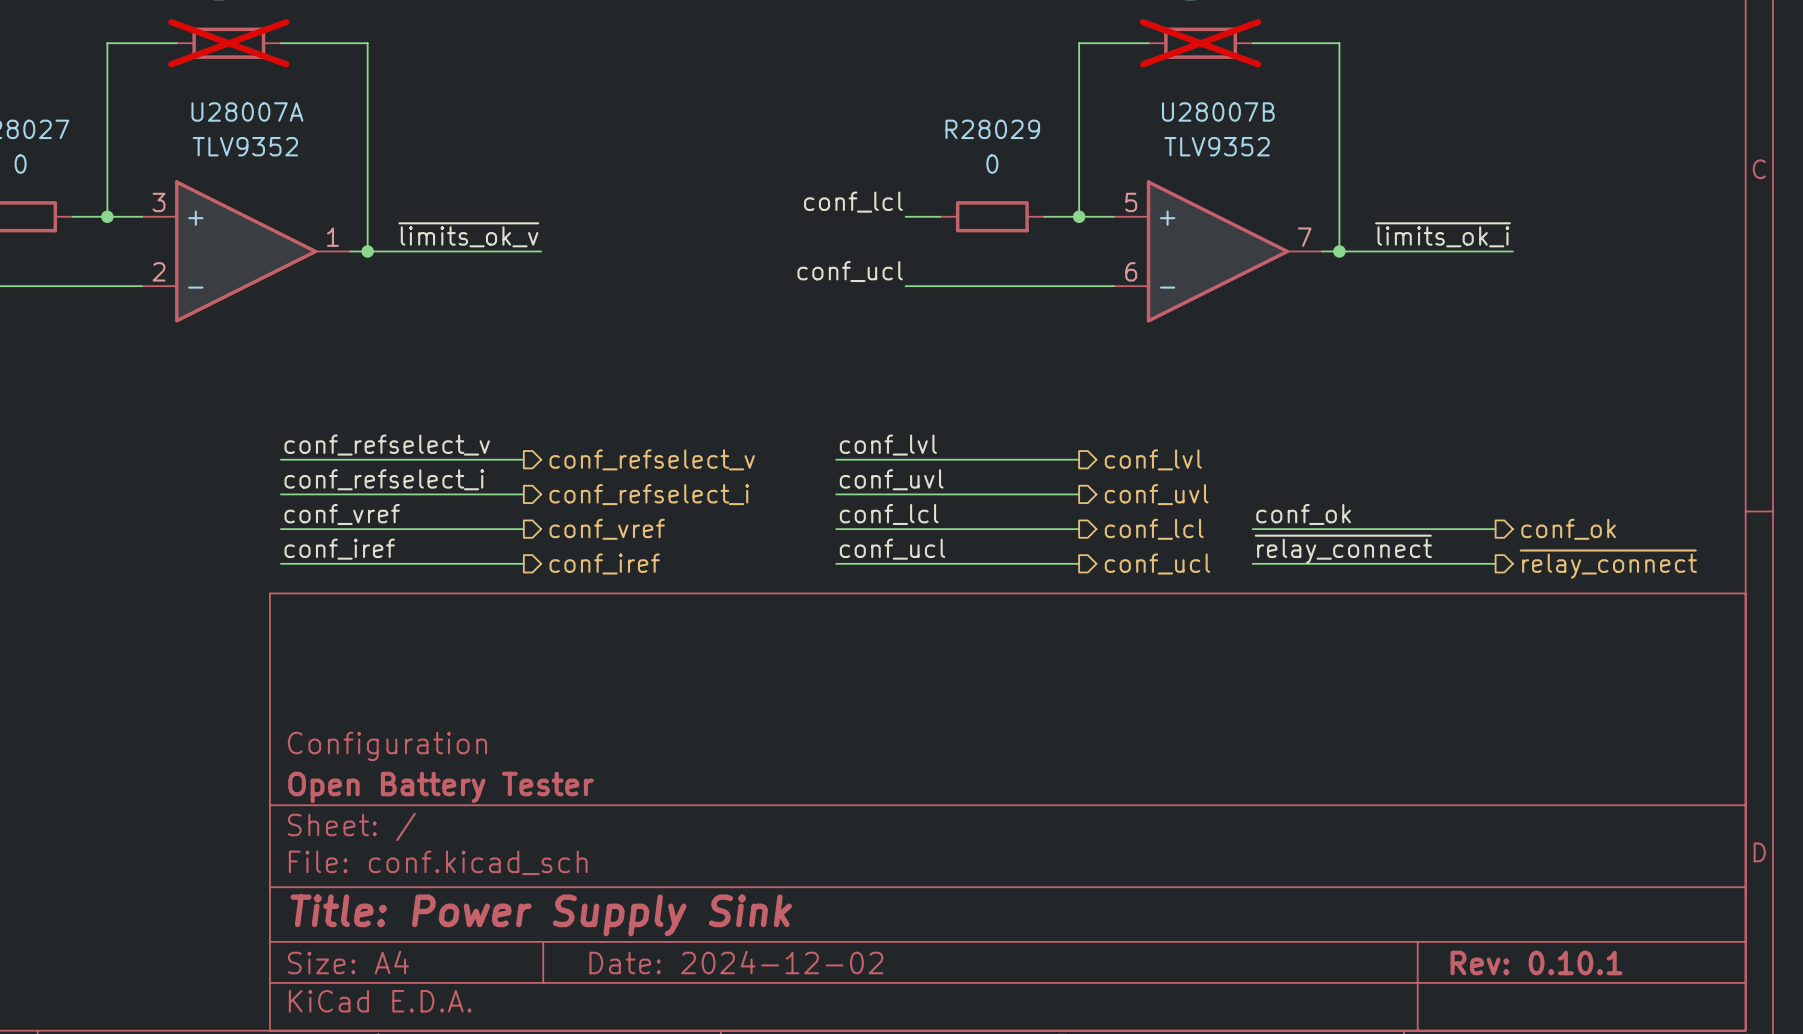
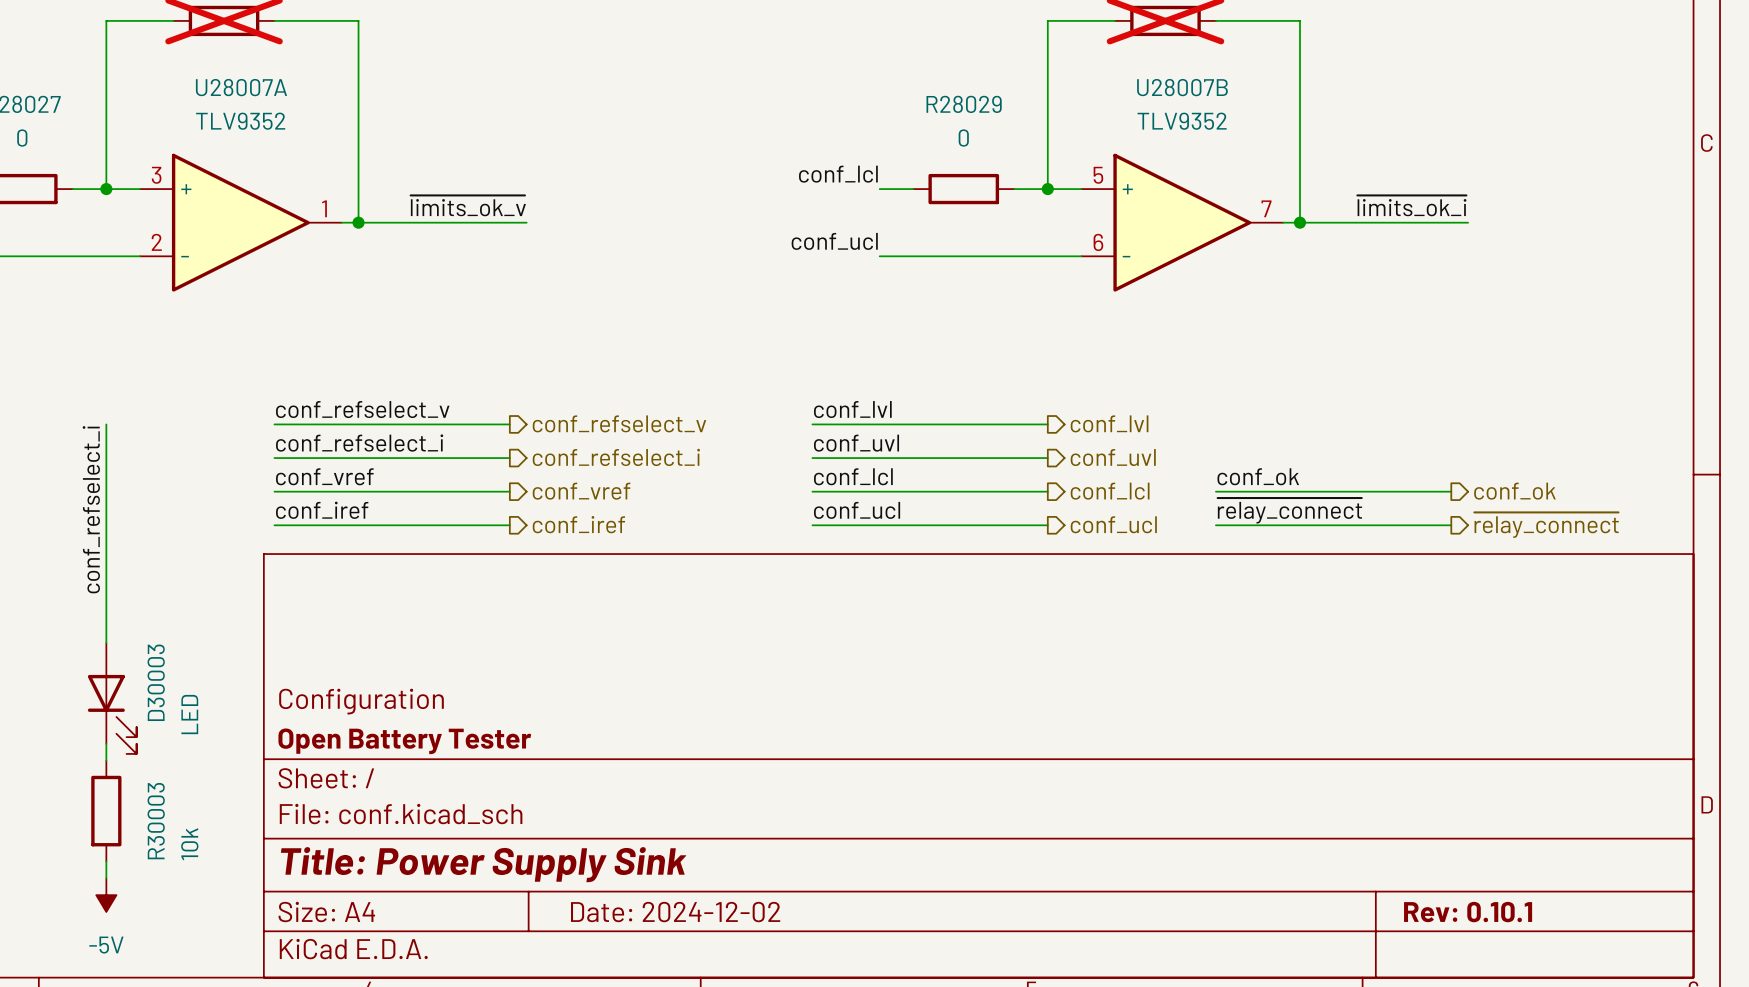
wire: none -> (106, 424) (106, 642)
label: none -> conf_refselect_i (91, 509)
D30003: none -> LED (112, 698)
wire: none -> (106, 743) (106, 760)
R30003: none -> 10k (106, 811)
wire: none -> (106, 861) (106, 878)
power symbol: none -> -5V (106, 895)

